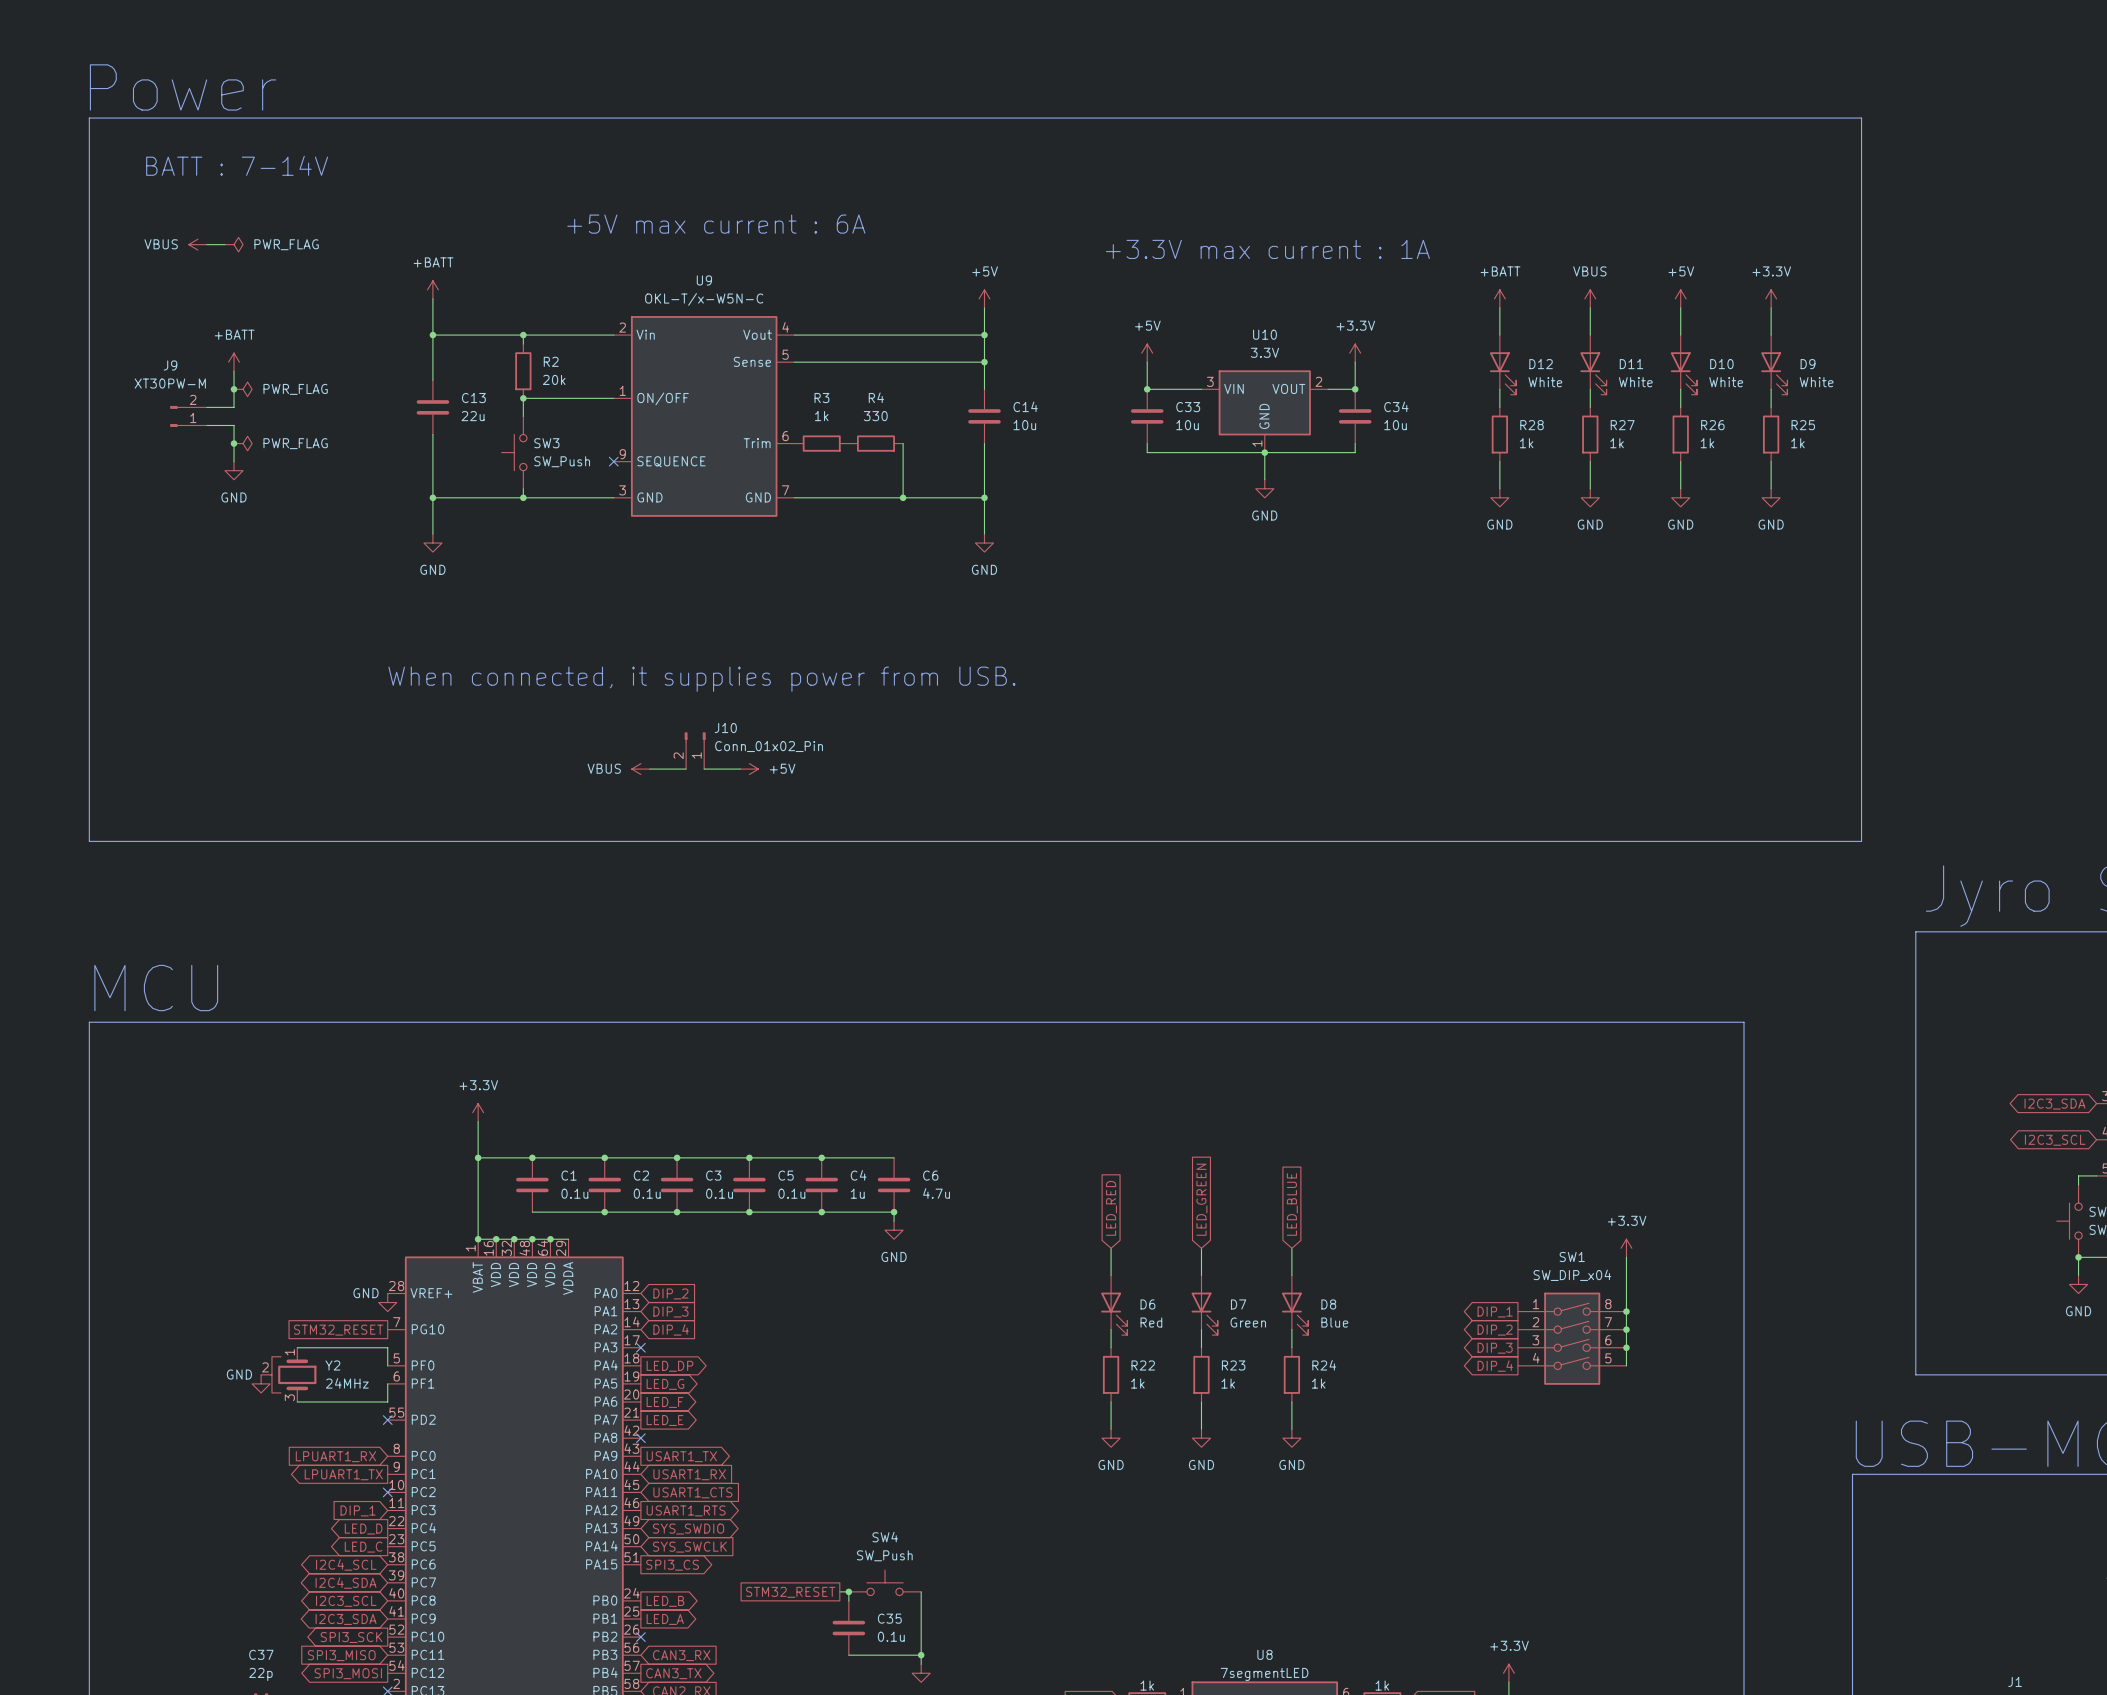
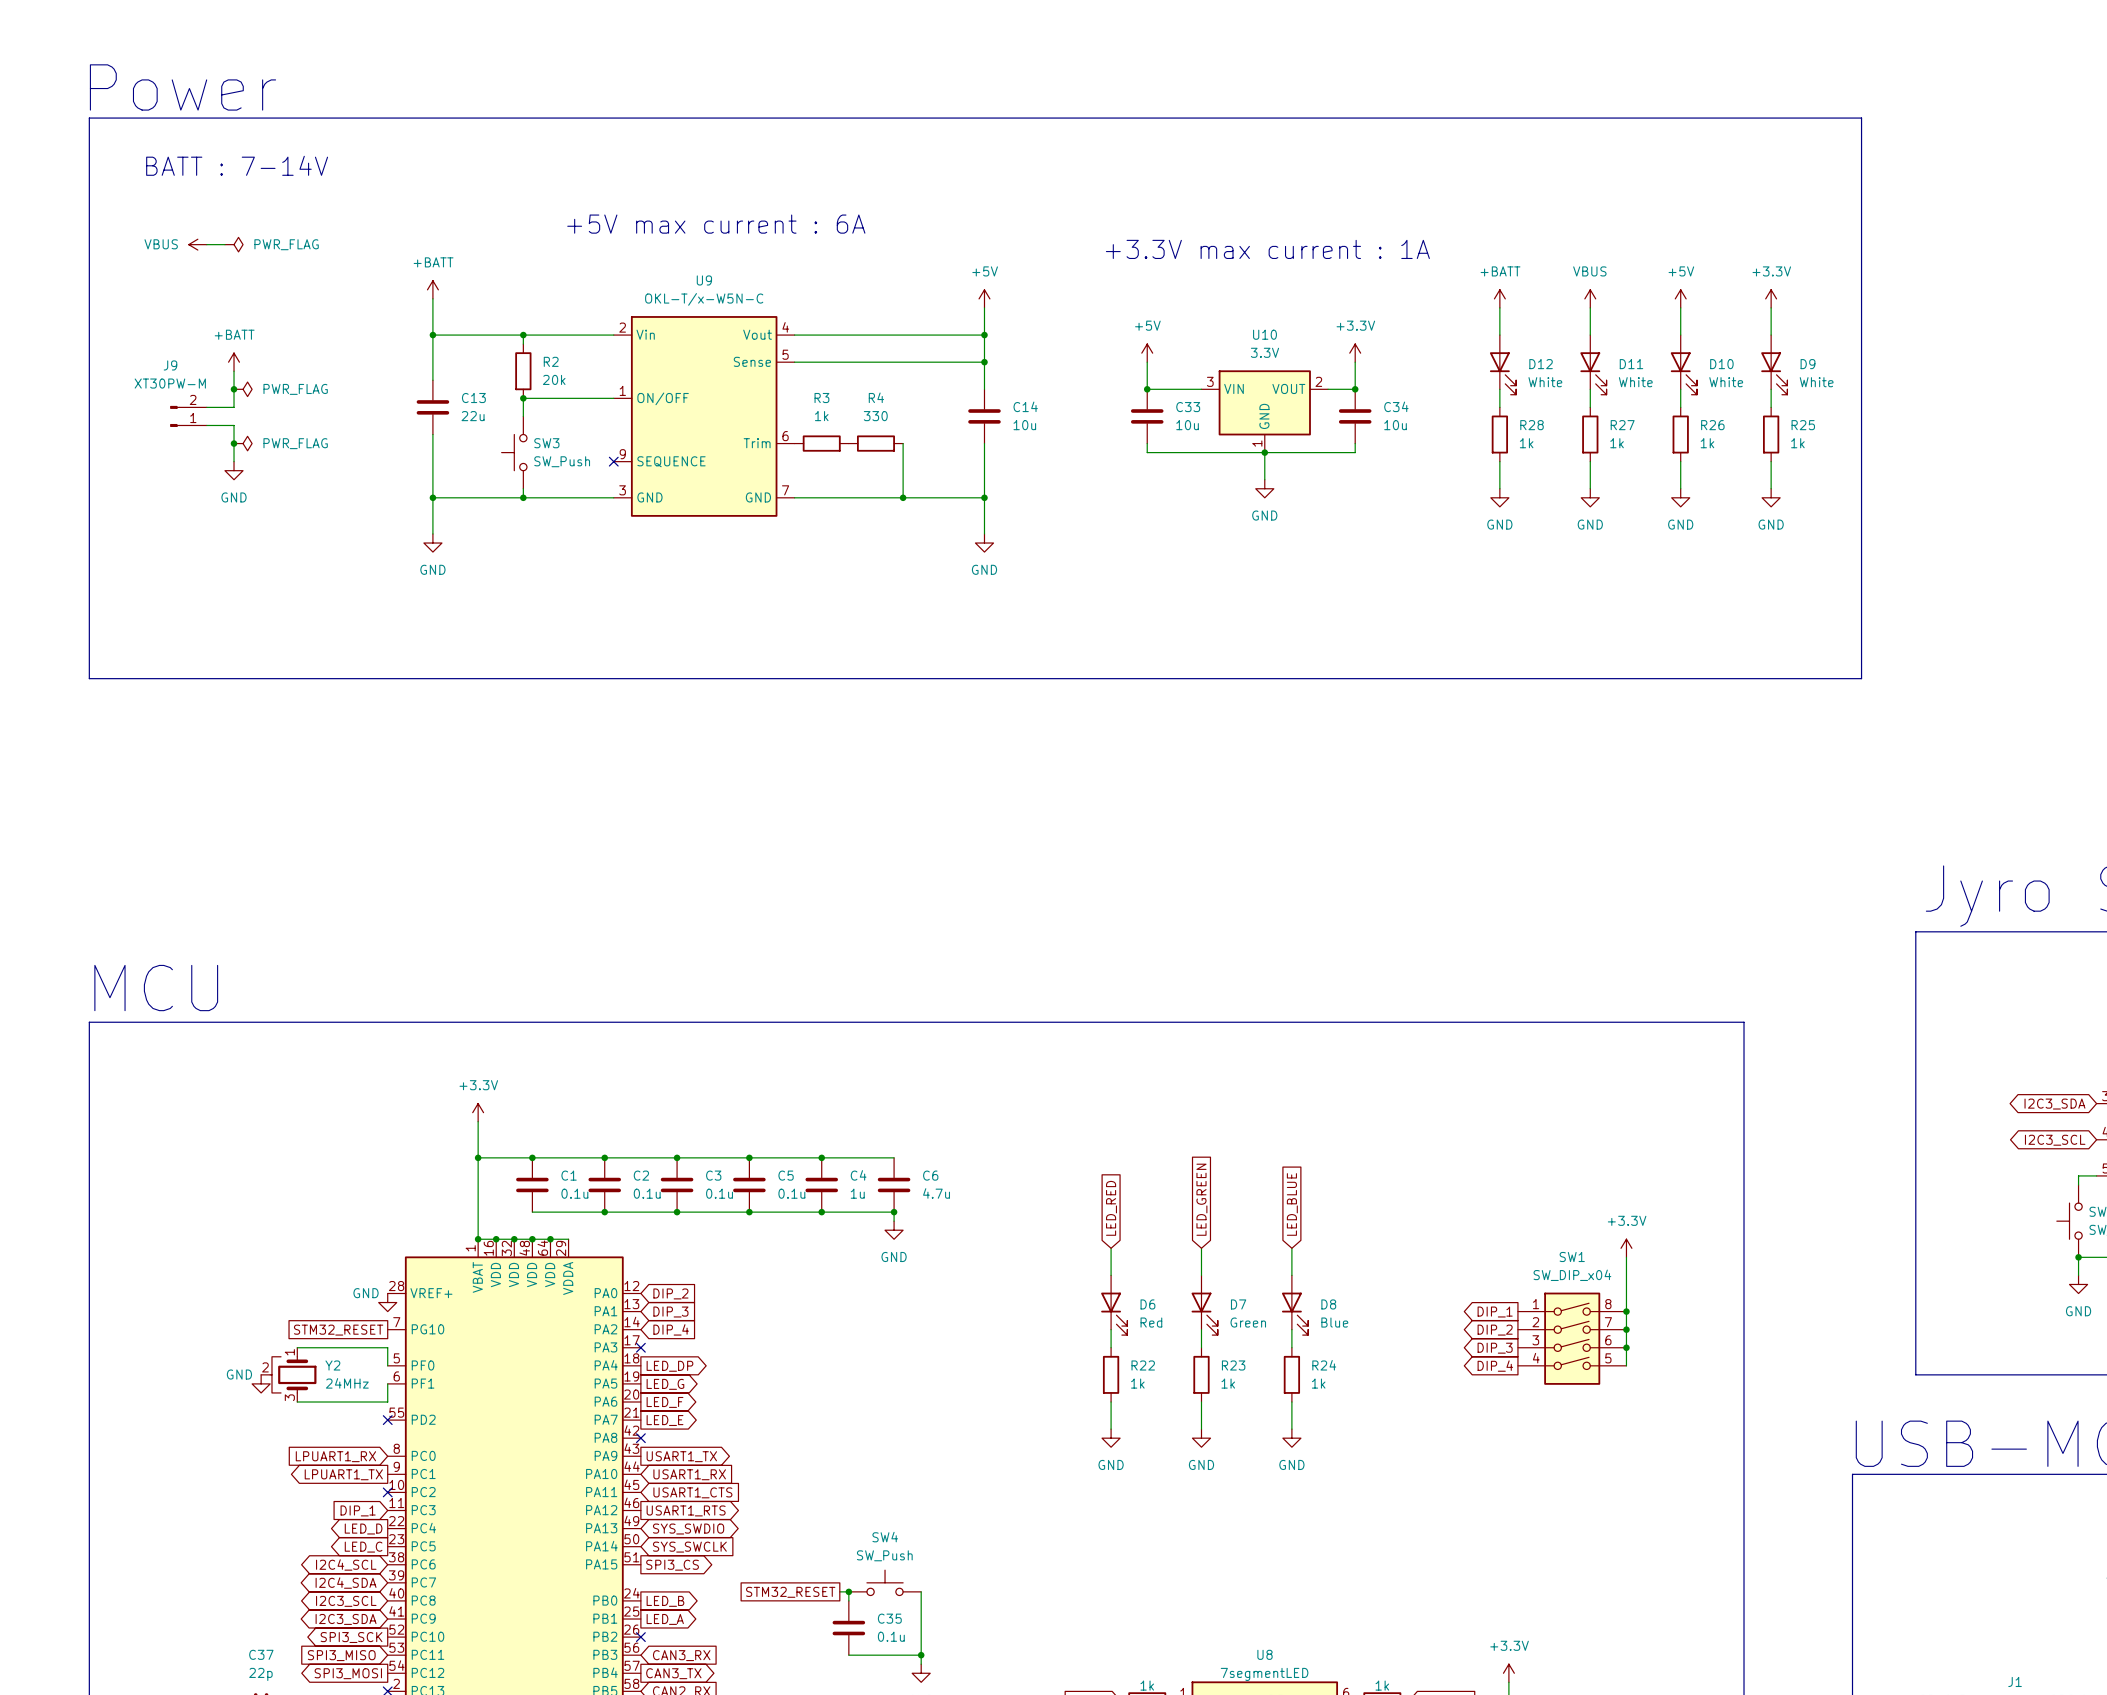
line: (89, 678) (89, 841) (1861, 841) (1861, 678) -> (89, 678) (1861, 678)
text: When connected, it supplies power from USB. (701, 679) -> none
J10: Conn_01x02_Pin (695, 750) -> none
power symbol: VBUS (640, 769) -> none
wire: (649, 769) (686, 769) -> none
wire: (704, 769) (740, 769) -> none
power symbol: +5V (749, 769) -> none

